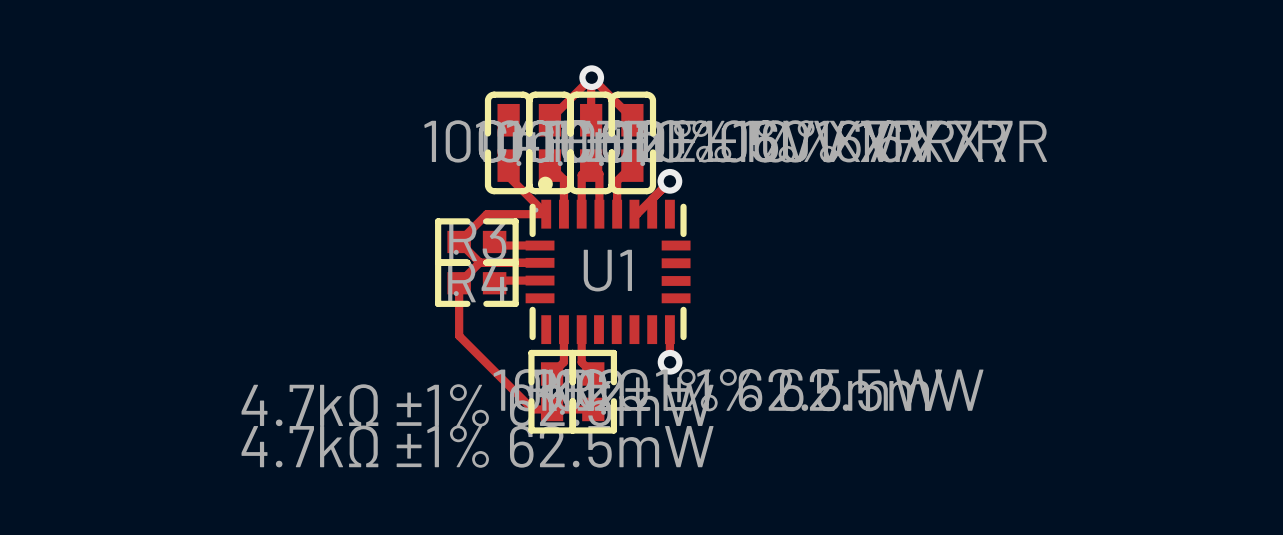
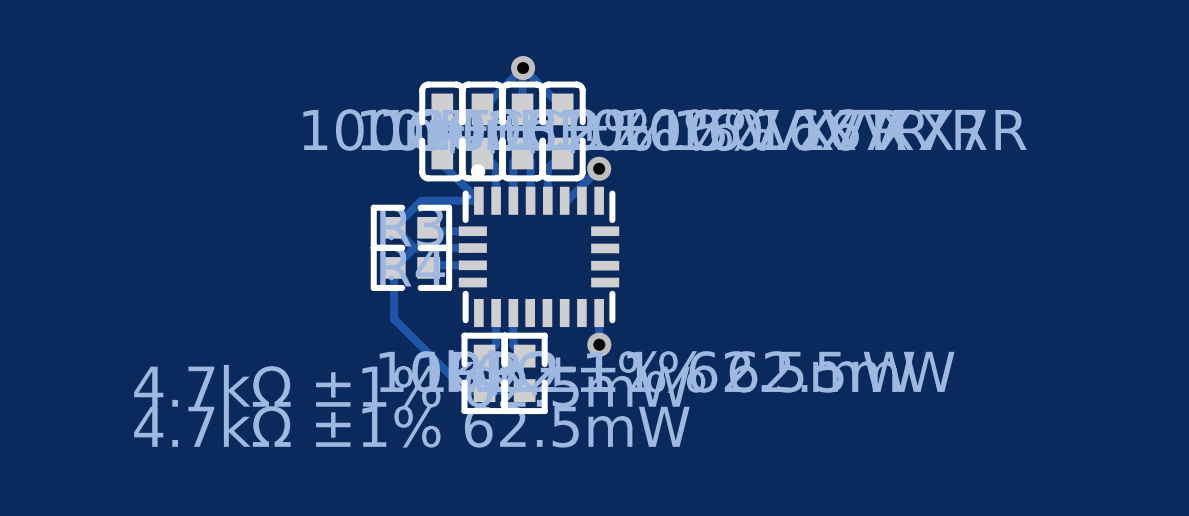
U1 name: U1 (607, 270) -> none

